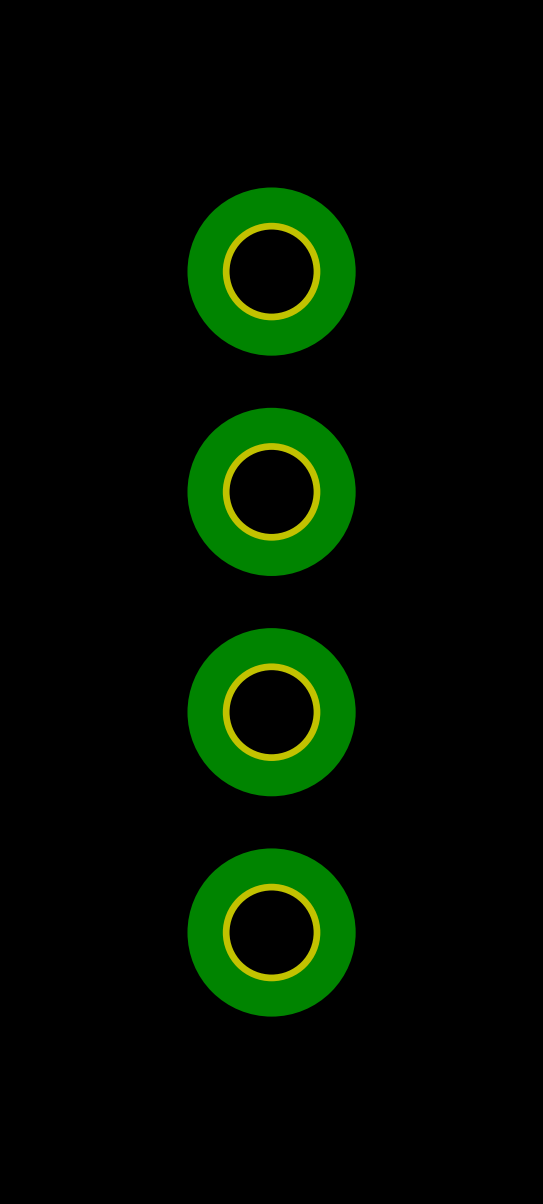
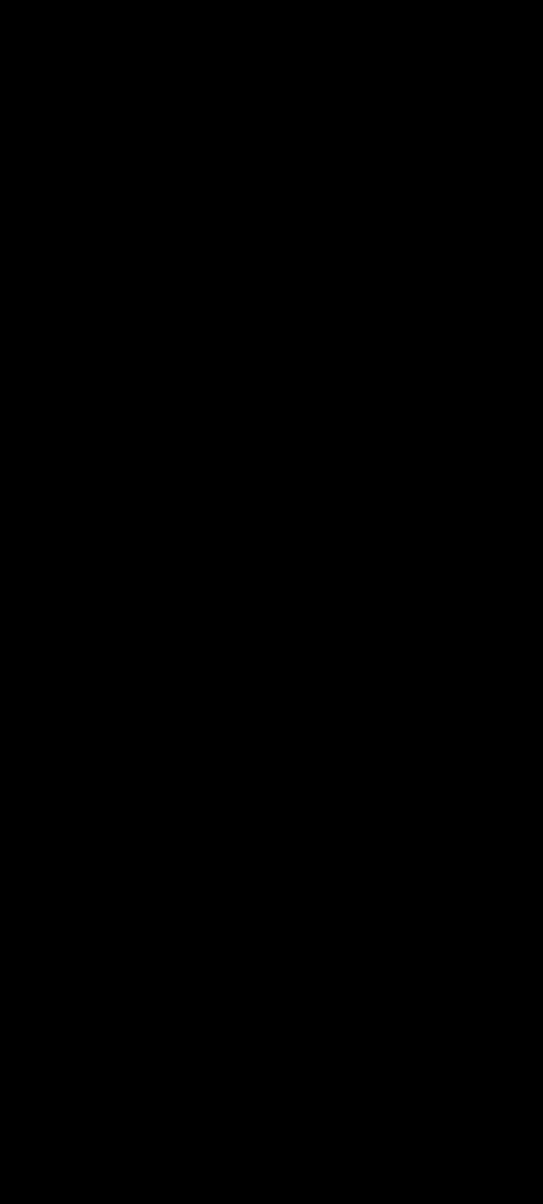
part: (271, 271) -> none
part: (271, 491) -> none
part: (271, 712) -> none
part: (271, 932) -> none

